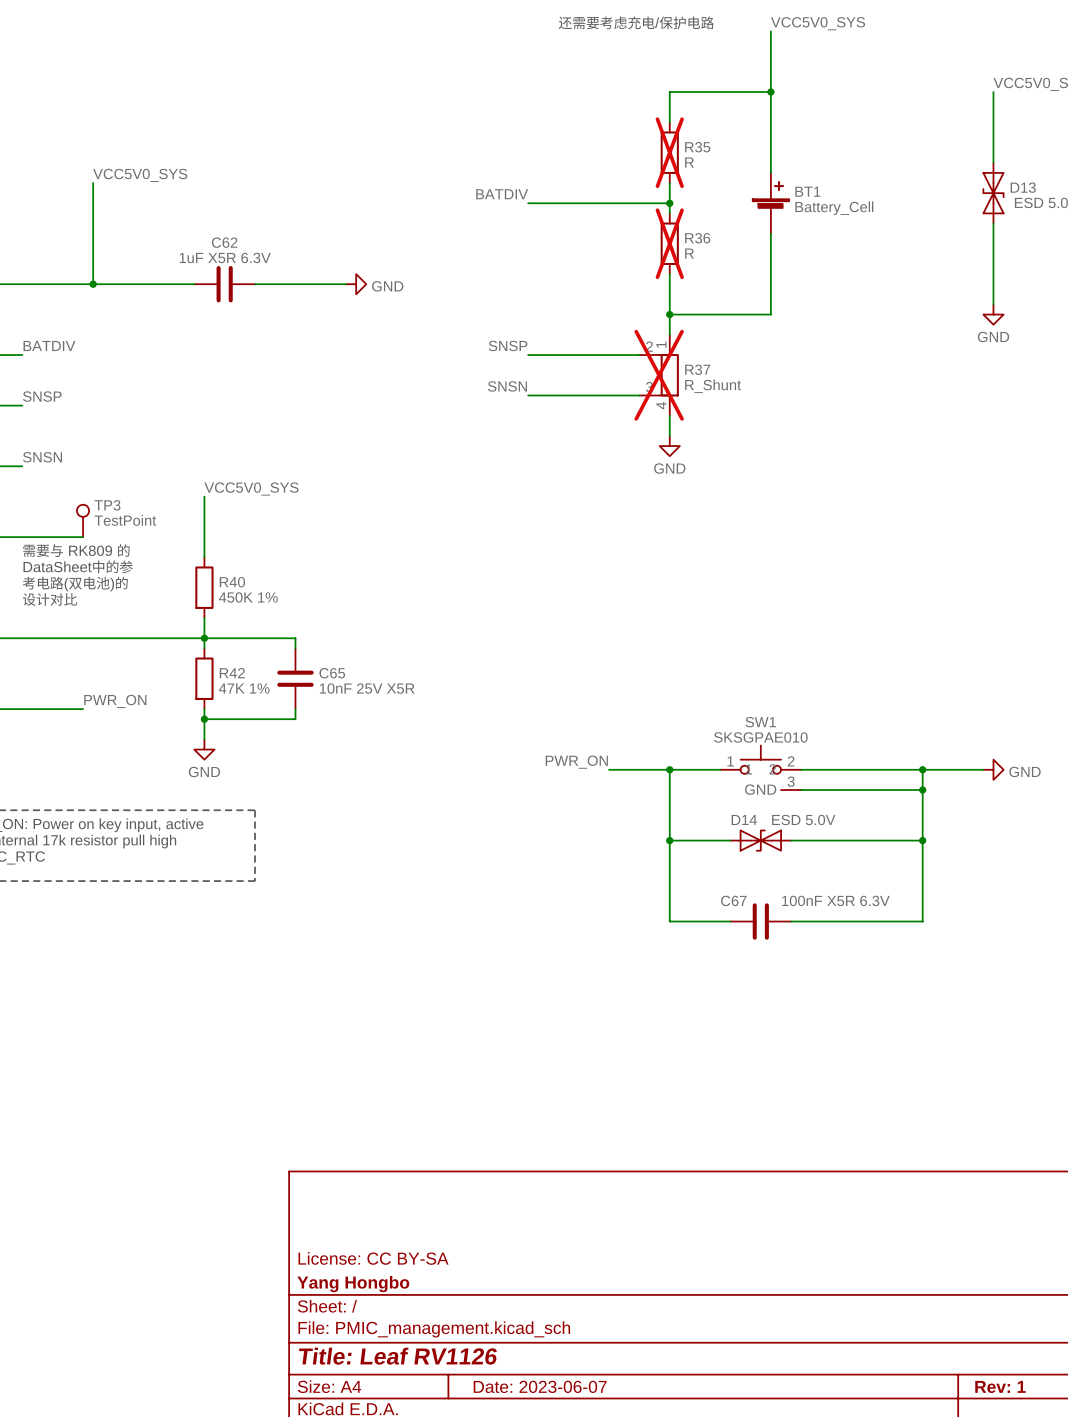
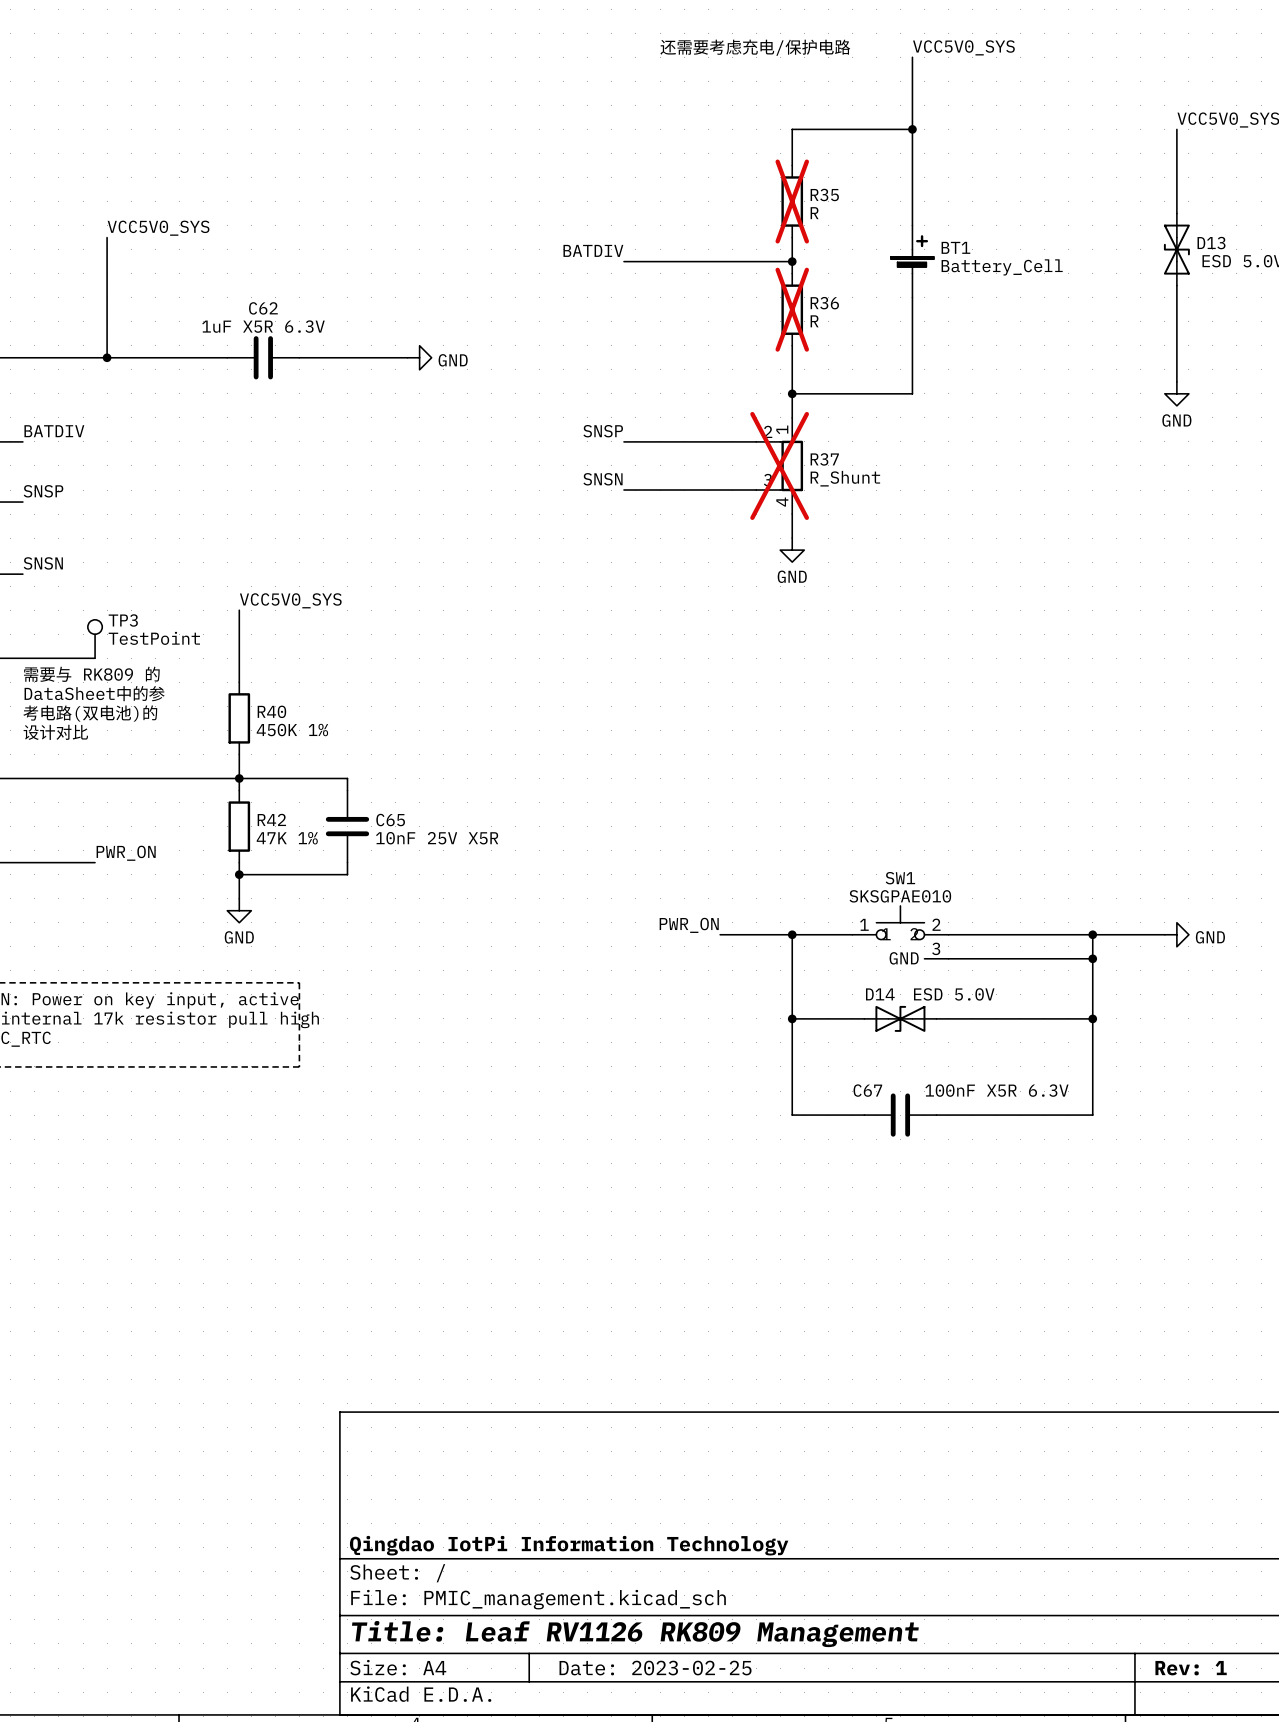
title block: License: CC BY-SA (373, 1258) -> none
title block: Yang Hongbo (353, 1284) -> Qingdao IotPi Information Technology (569, 1545)
title block: Title: Leaf RV1126 (397, 1356) -> Title: Leaf RV1126 RK809 Management (635, 1634)
title block: Date: 2023-06-07 (540, 1386) -> Date: 2023-02-25 (655, 1668)

